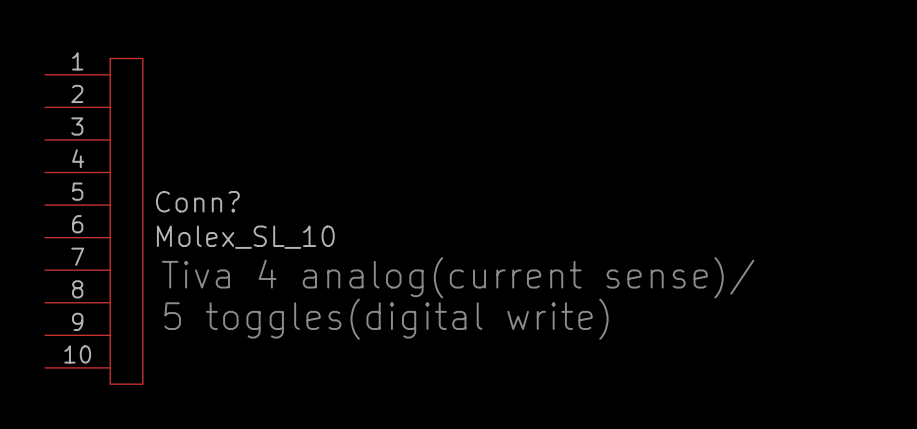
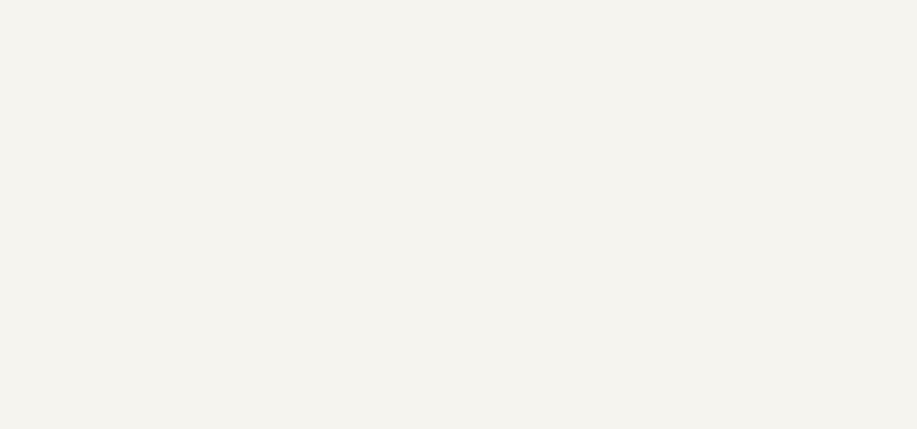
Conn?: Molex_SL_10 (93, 221) -> none
text: Tiva 4 analog(current sense)/ (458, 277) -> none
text: 5 toggles(digital write) (386, 319) -> none

